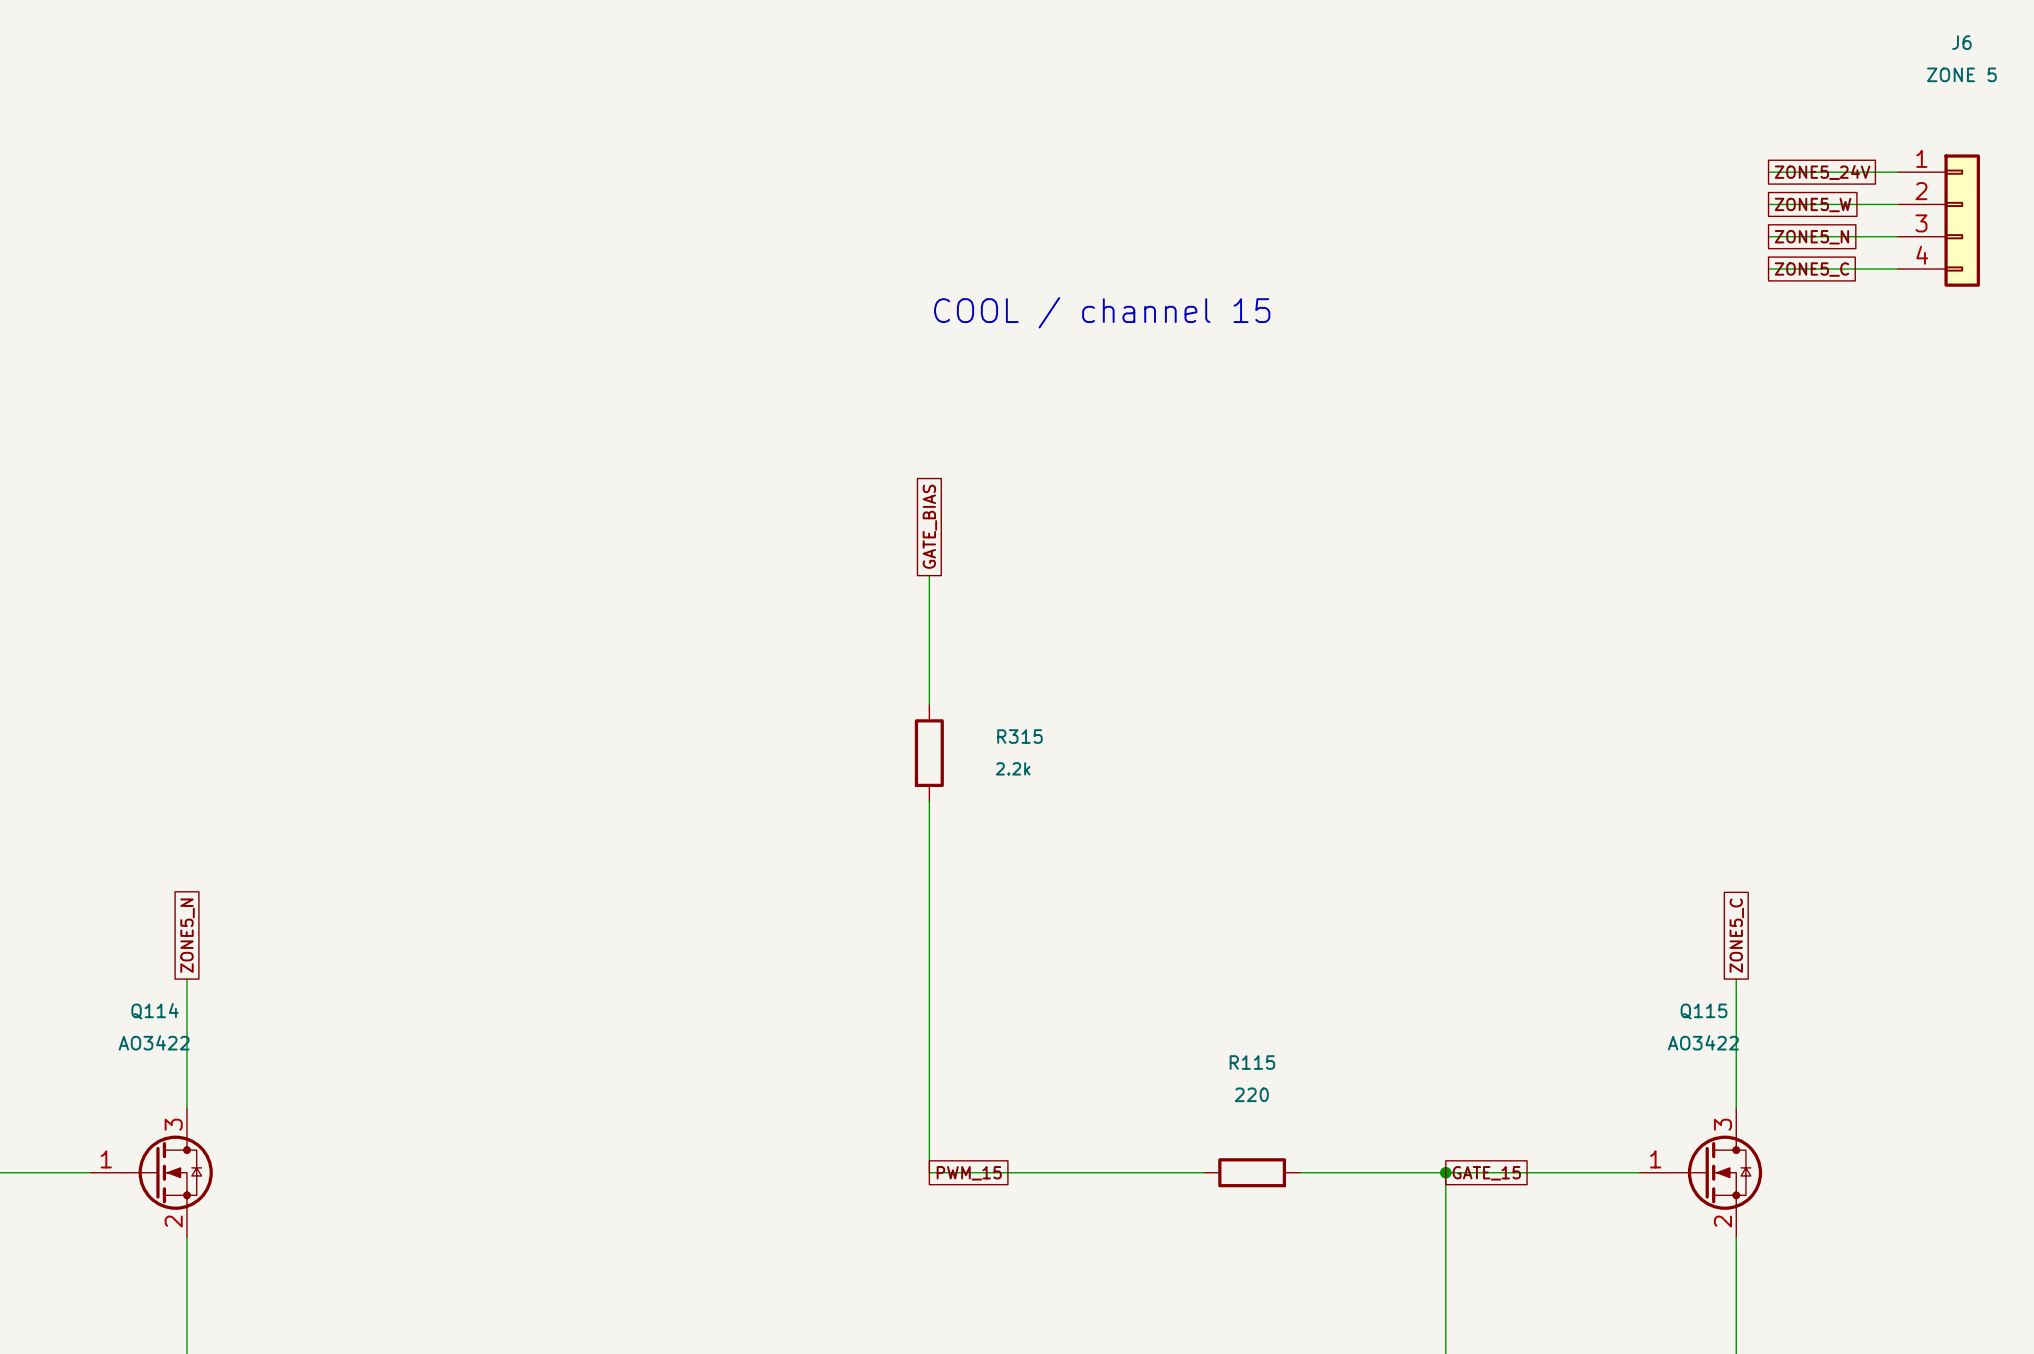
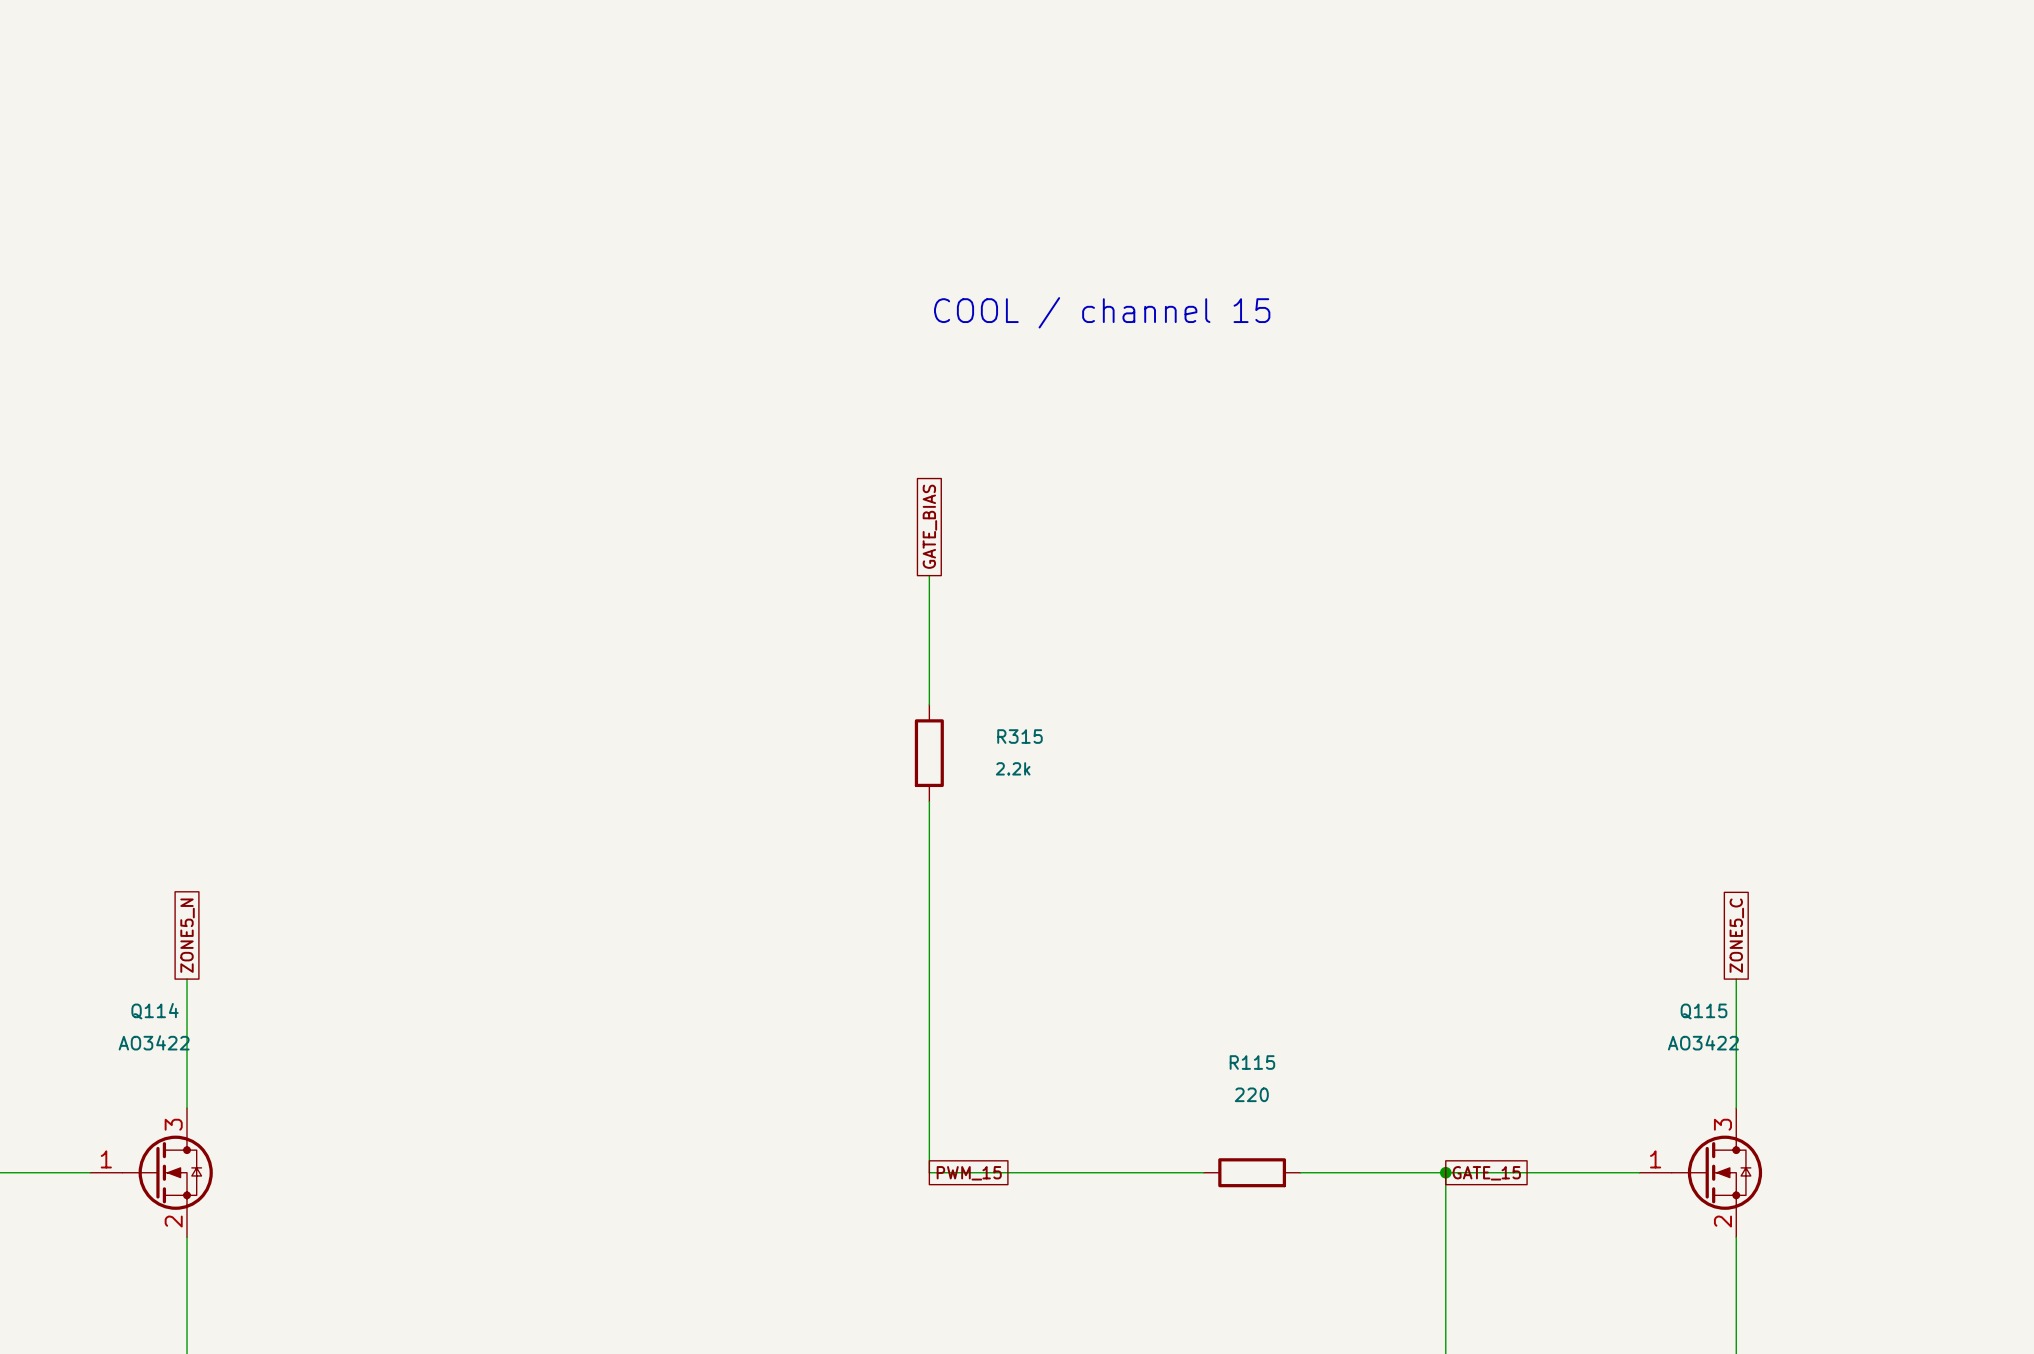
wire: (1768, 172) (1897, 172) -> none
global label: ZONE5_24V (1822, 172) -> none
wire: (1768, 204) (1897, 204) -> none
global label: ZONE5_W (1813, 204) -> none
J6: ZONE 5 (1938, 220) -> none
wire: (1768, 236) (1897, 236) -> none
global label: ZONE5_N (1811, 237) -> none
wire: (1768, 268) (1897, 268) -> none
global label: ZONE5_C (1811, 269) -> none

